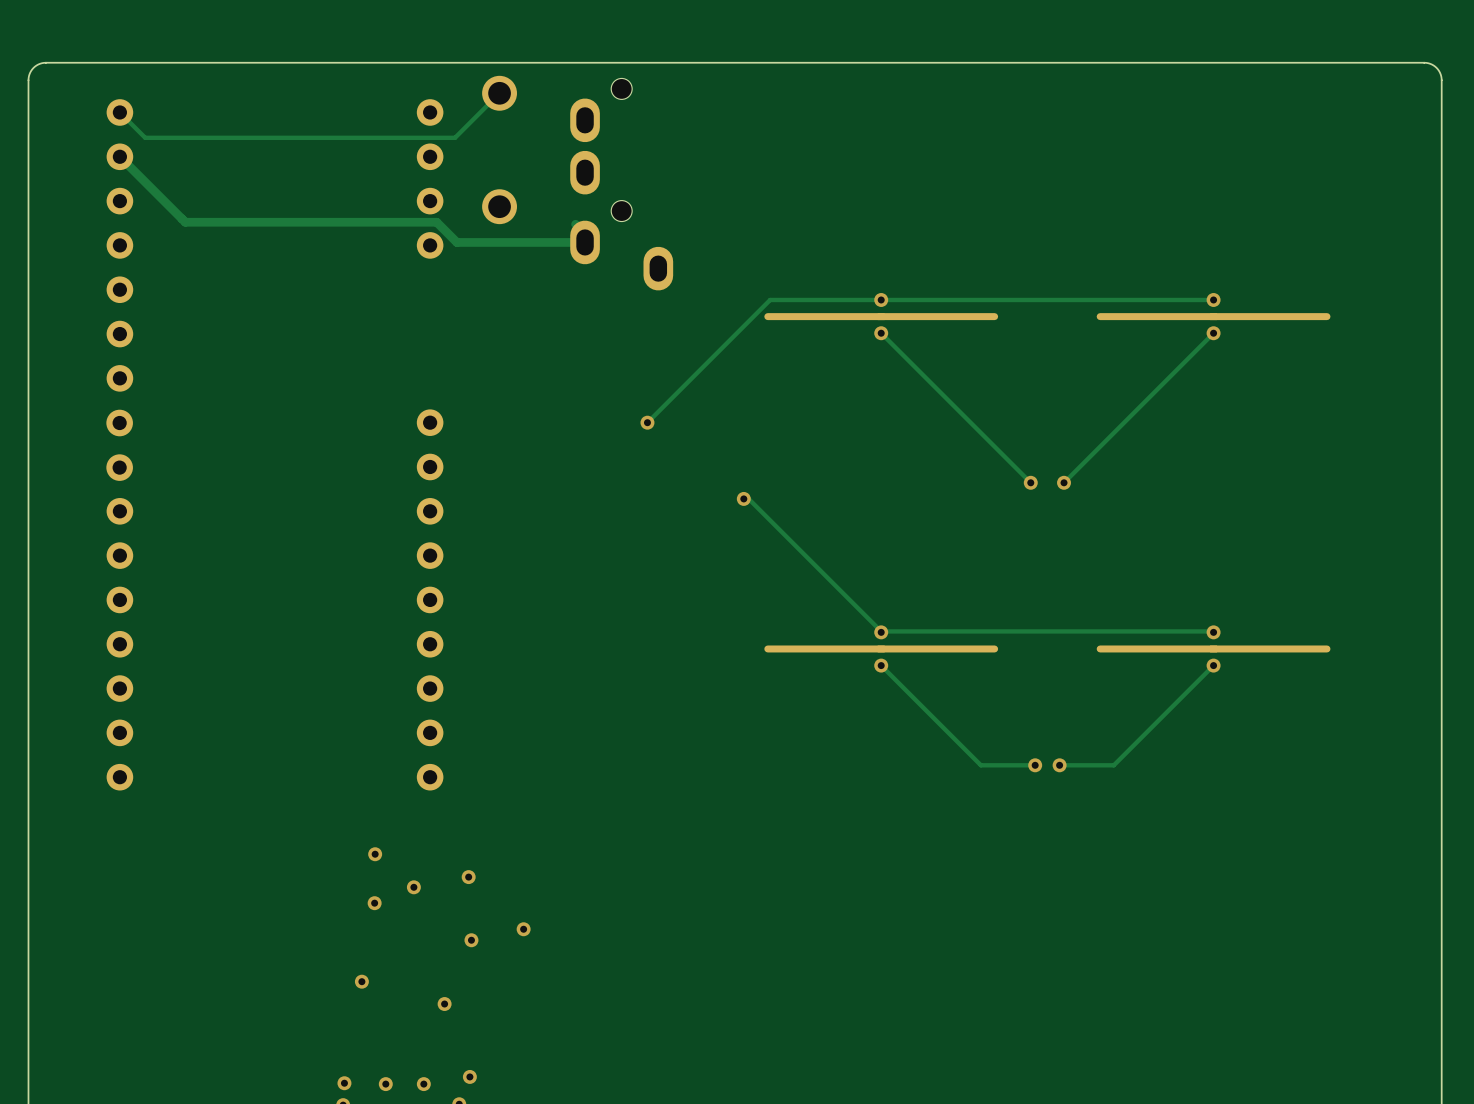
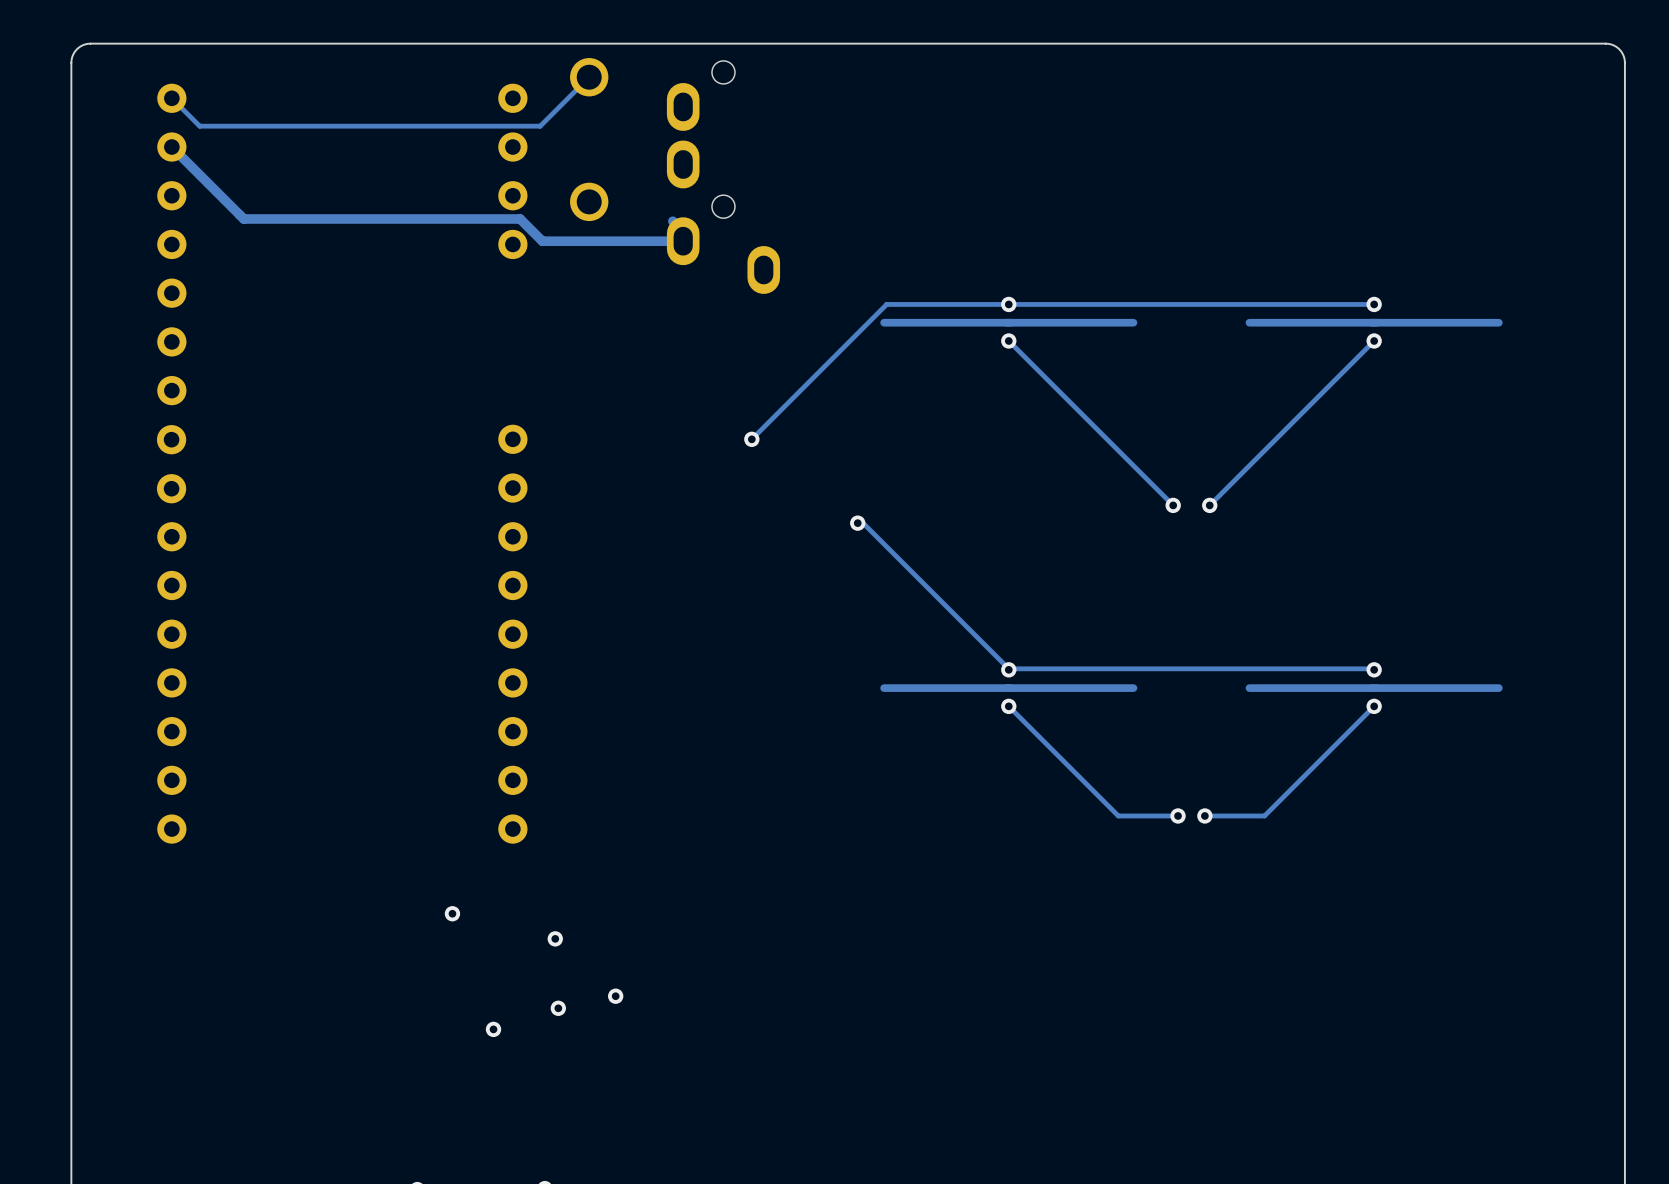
via: (413, 887) -> none
via: (374, 903) -> none
via: none -> (493, 1029)
via: (361, 981) -> none
via: (444, 1004) -> none
via: (469, 1076) -> none
via: (344, 1083) -> none
via: (385, 1084) -> none
via: (423, 1084) -> none

